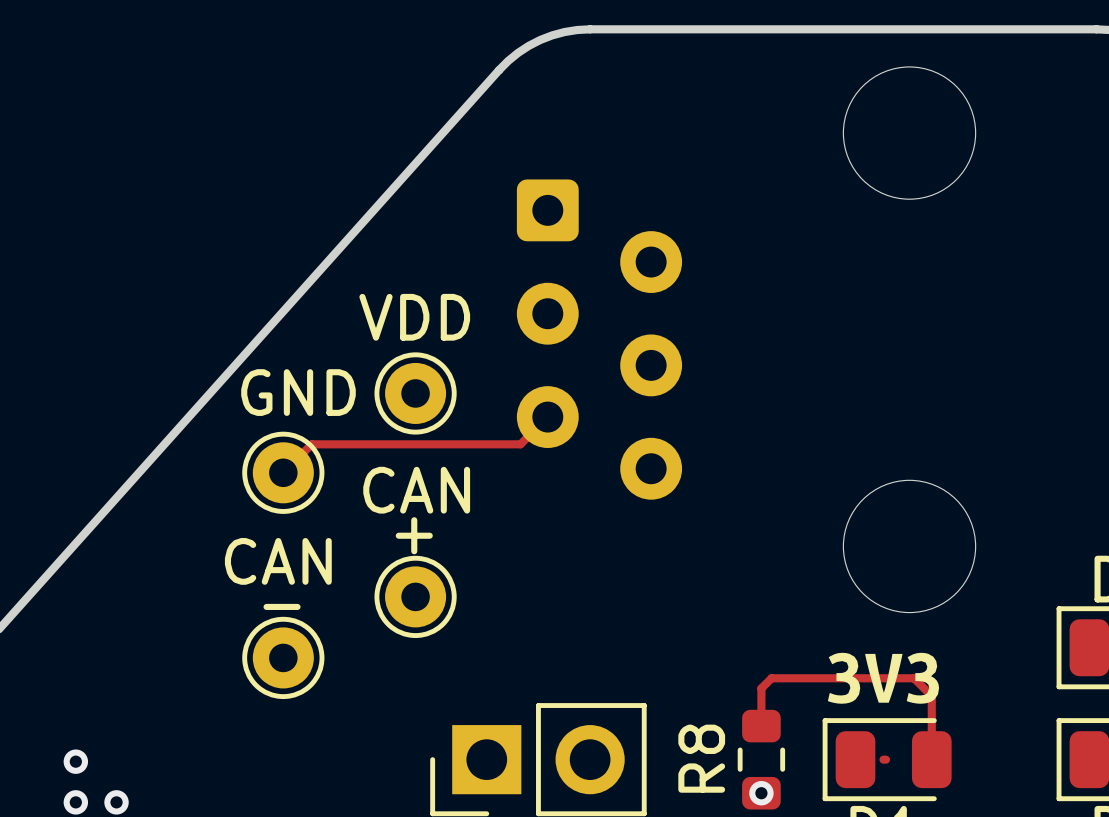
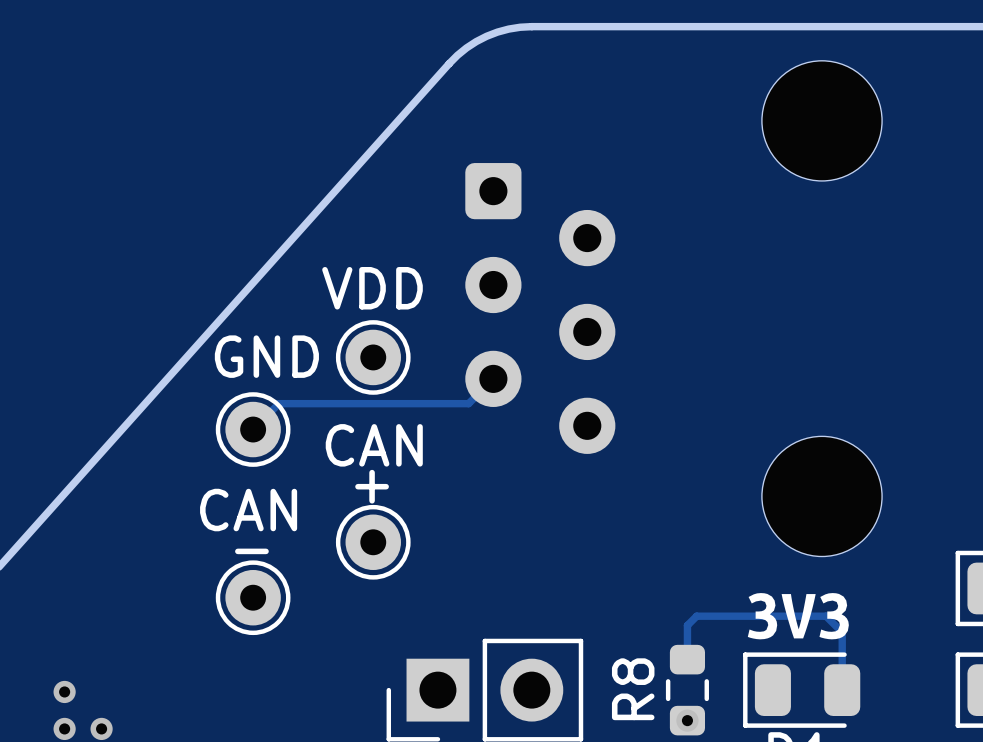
track: (883, 759) (886, 759) -> none

